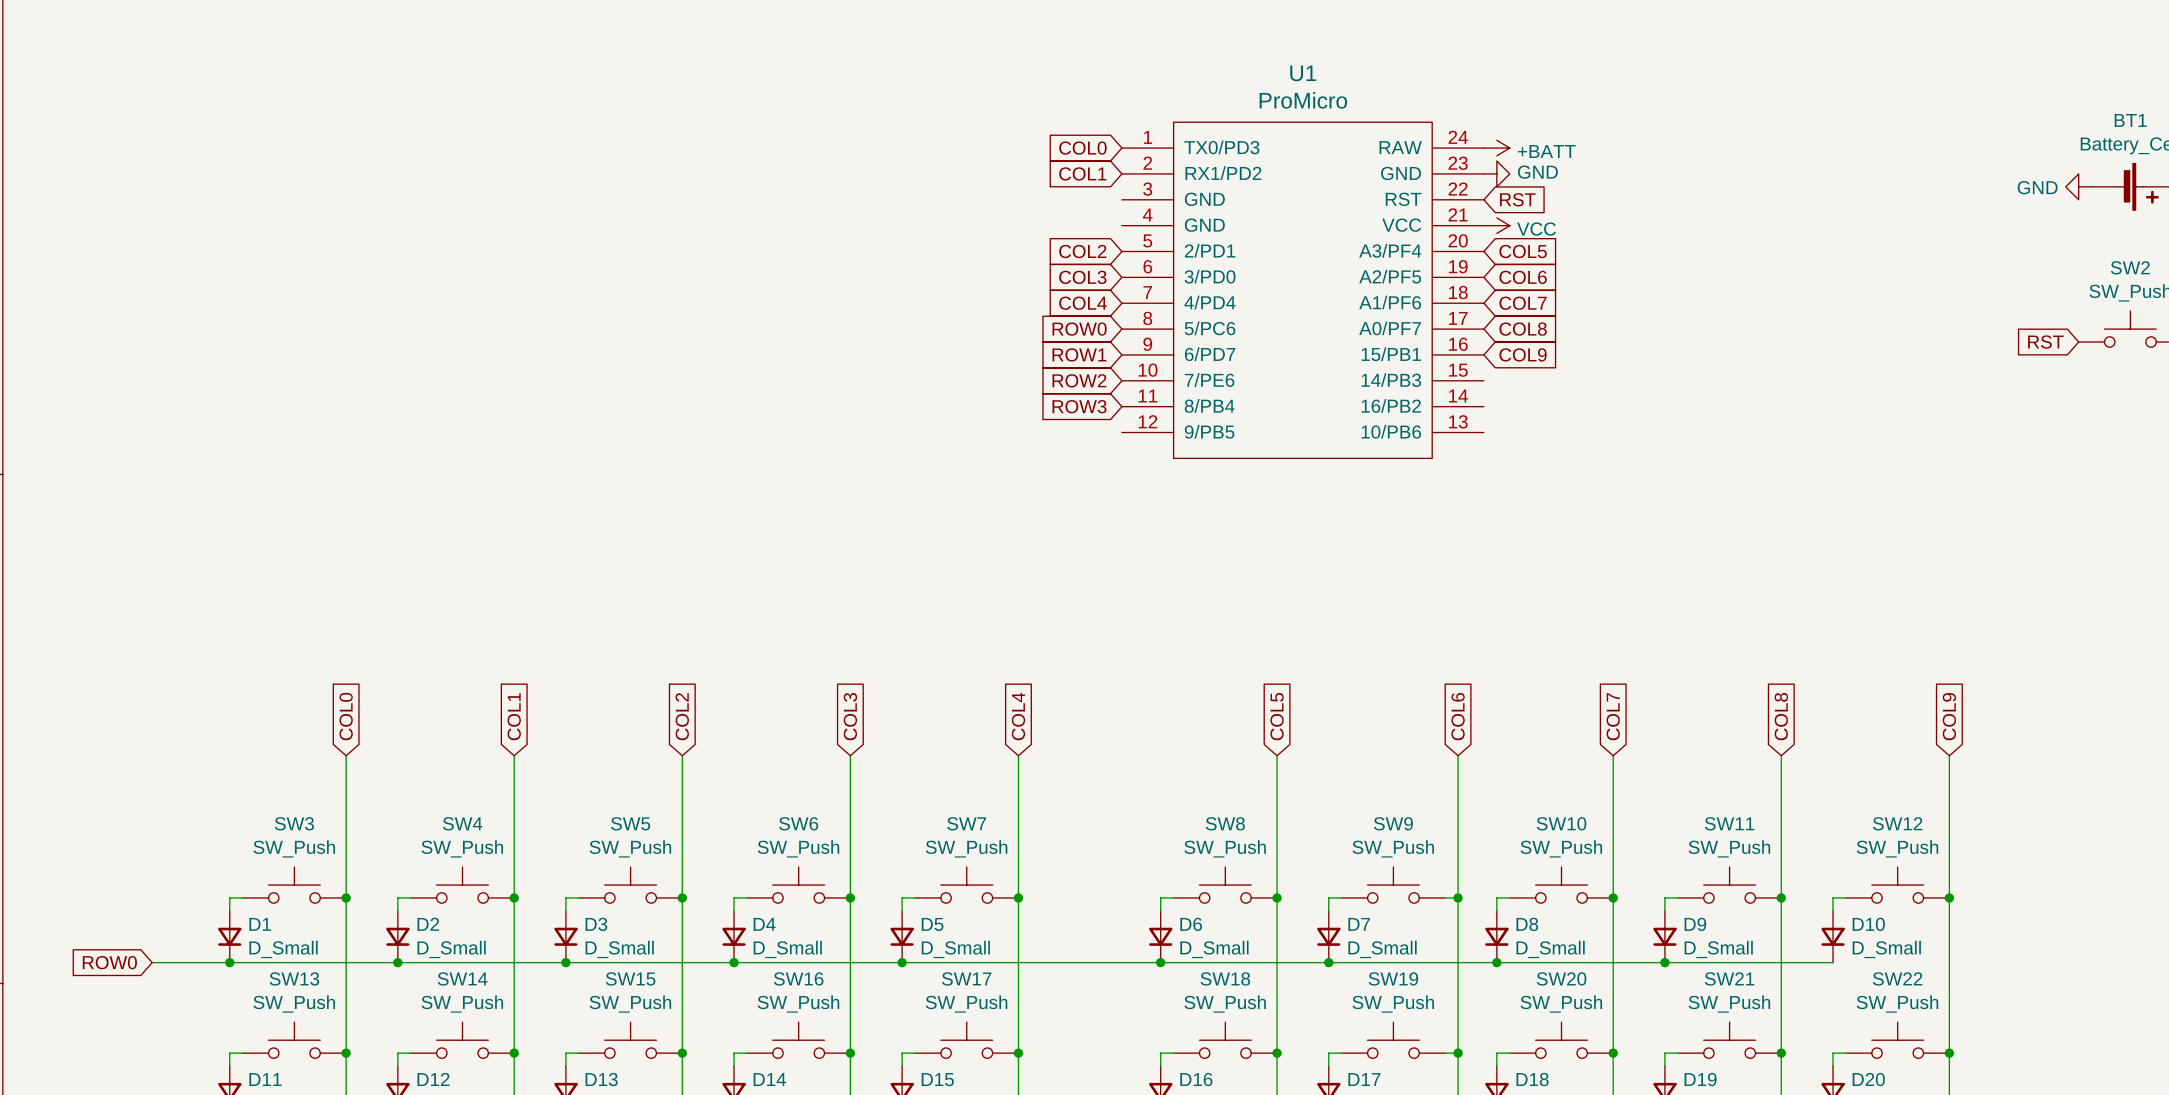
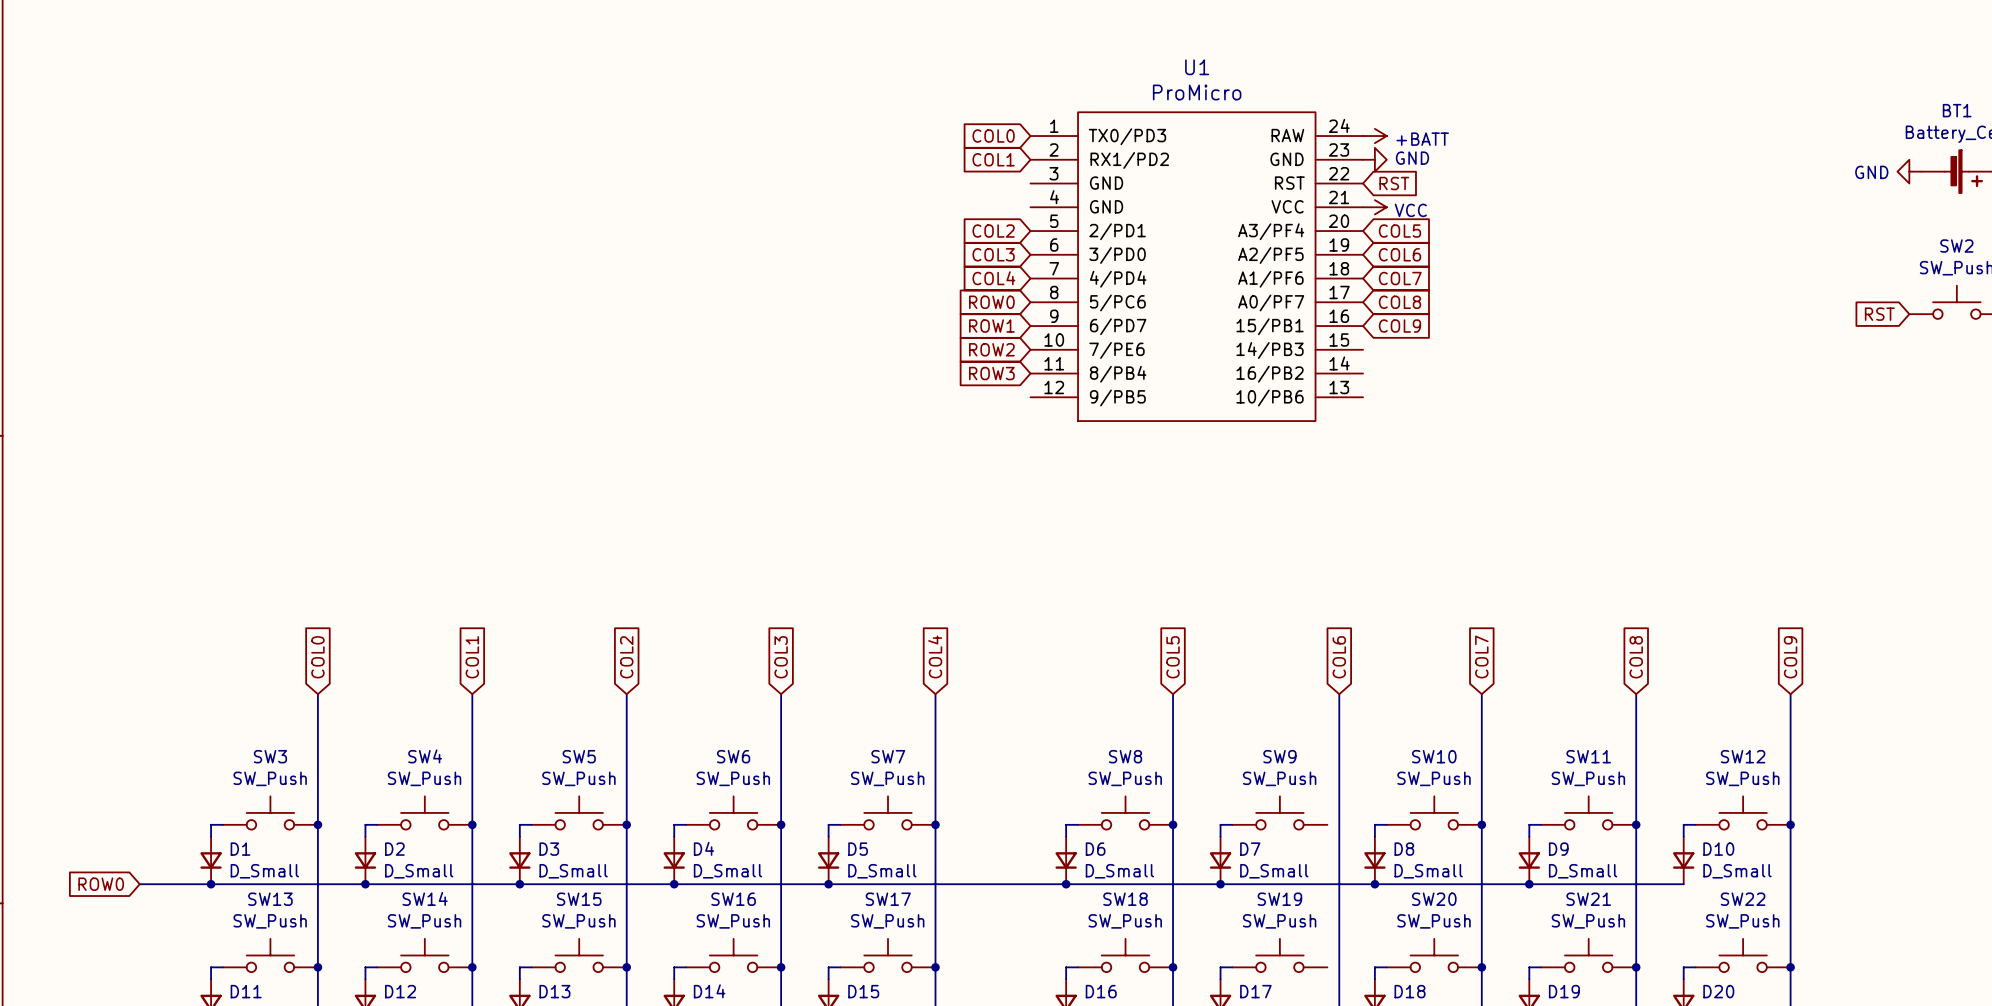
wire: (1445, 897) (1458, 897) -> none
junction: (1458, 897) -> none
wire: (1445, 1053) (1458, 1053) -> none
junction: (1458, 1053) -> none

